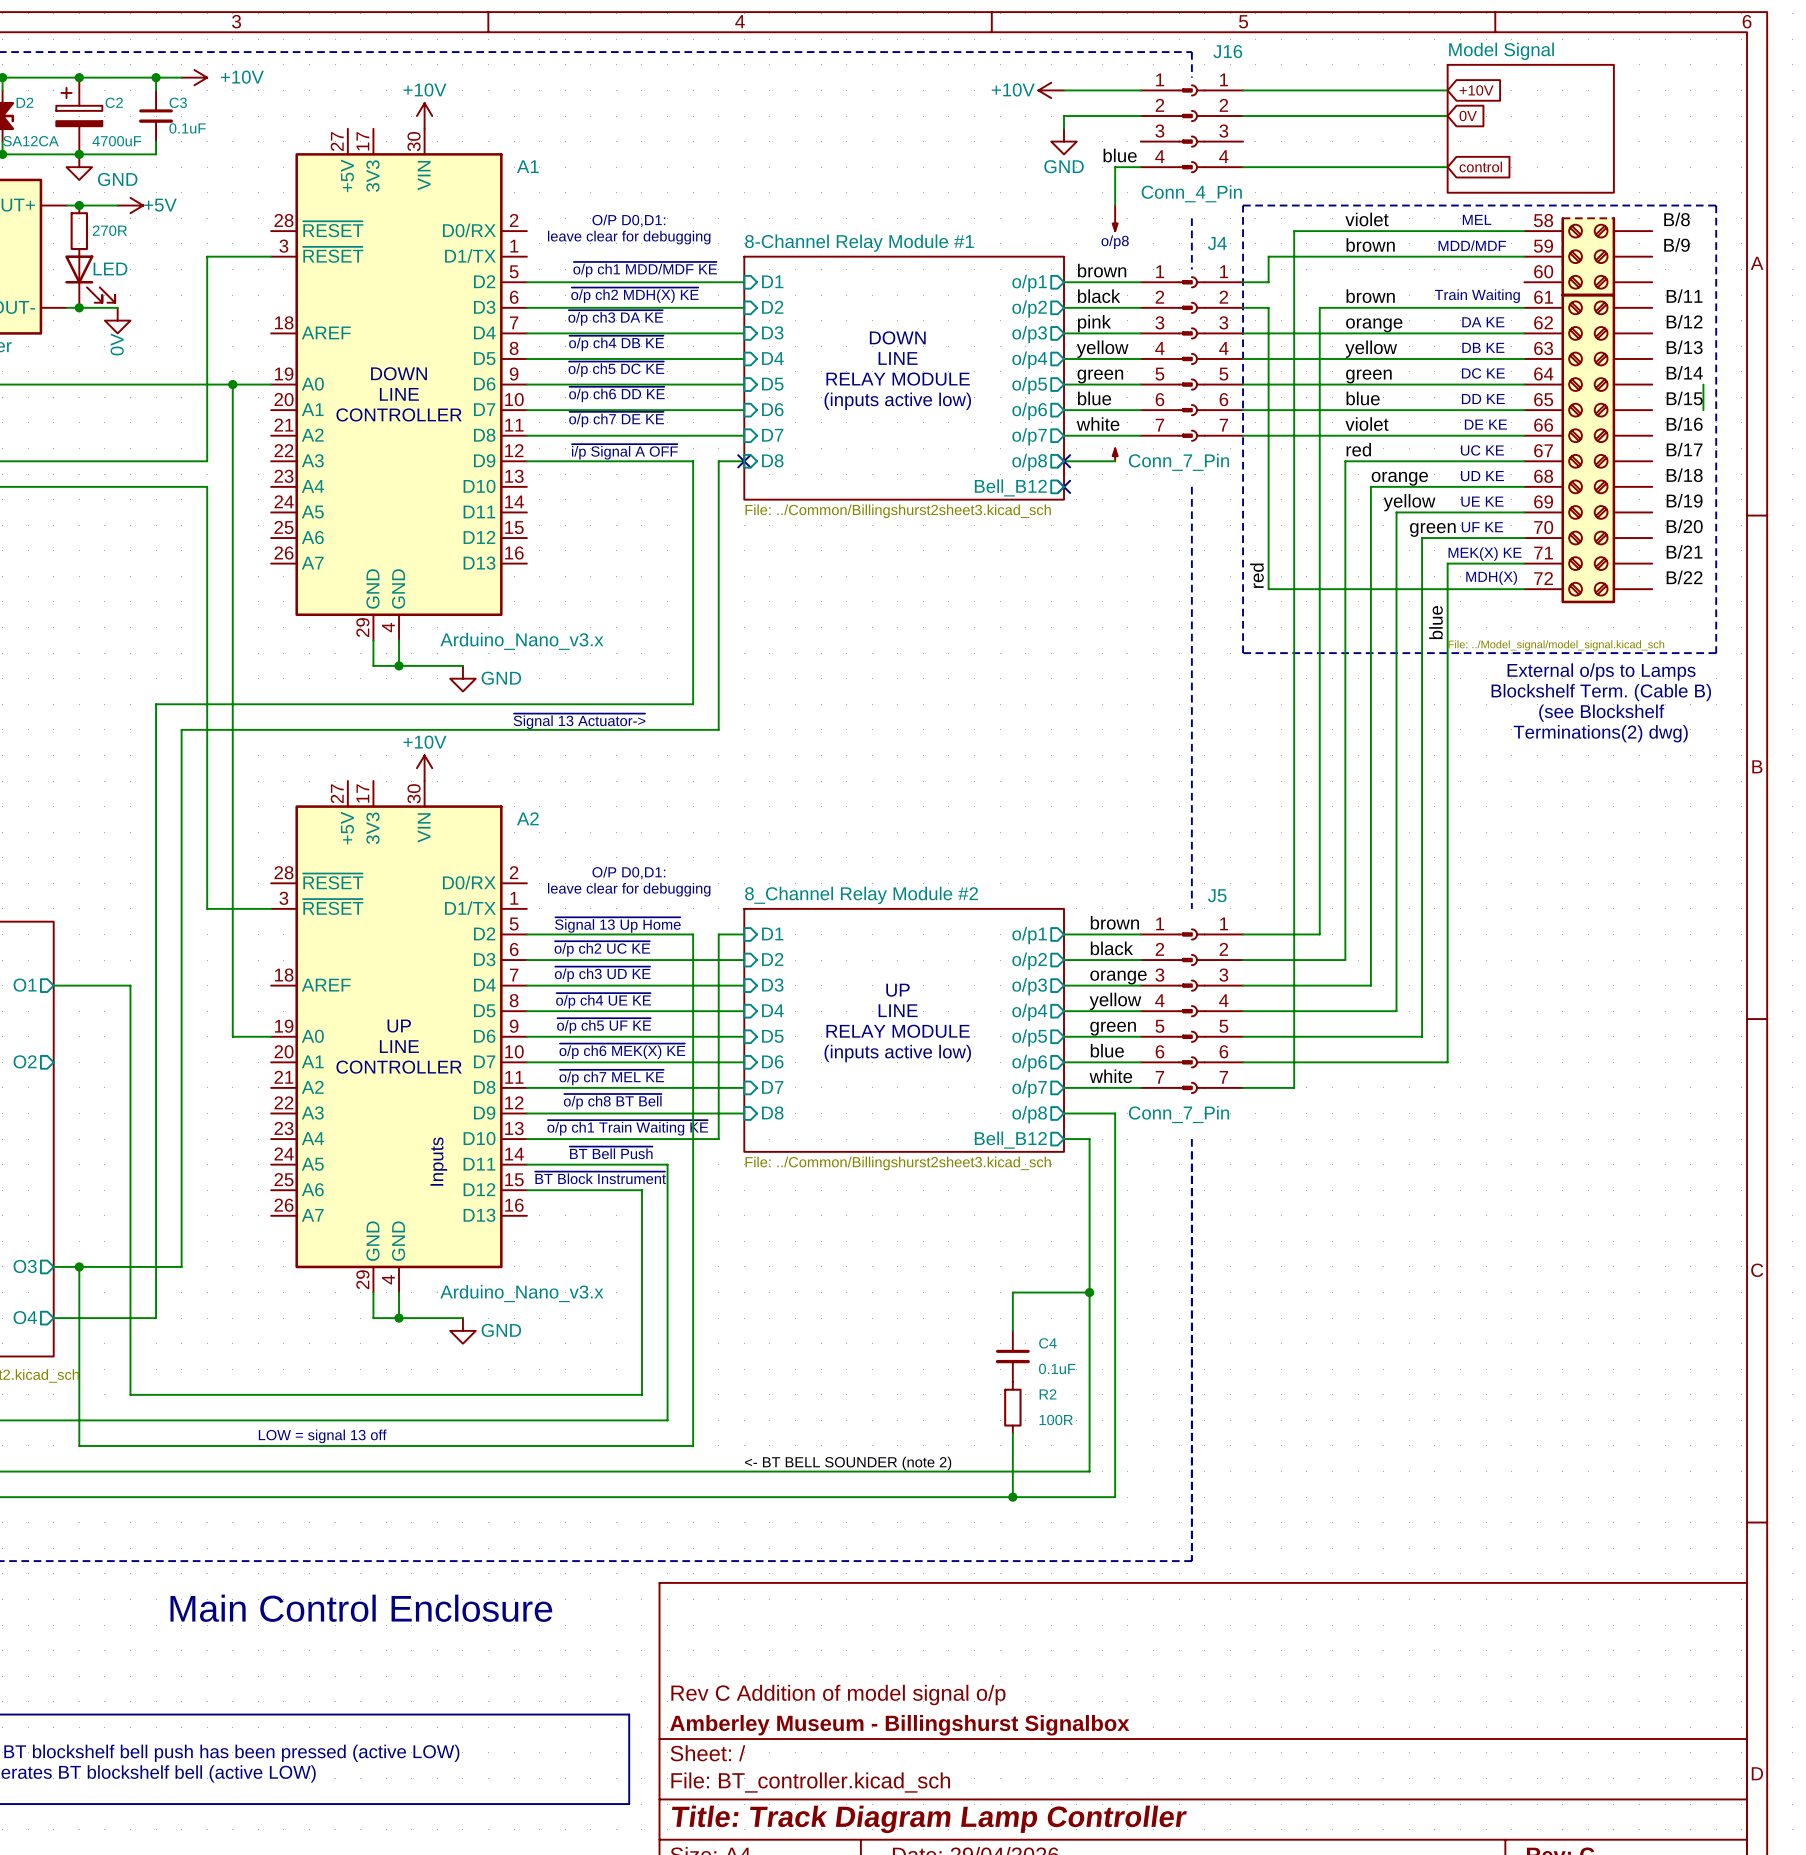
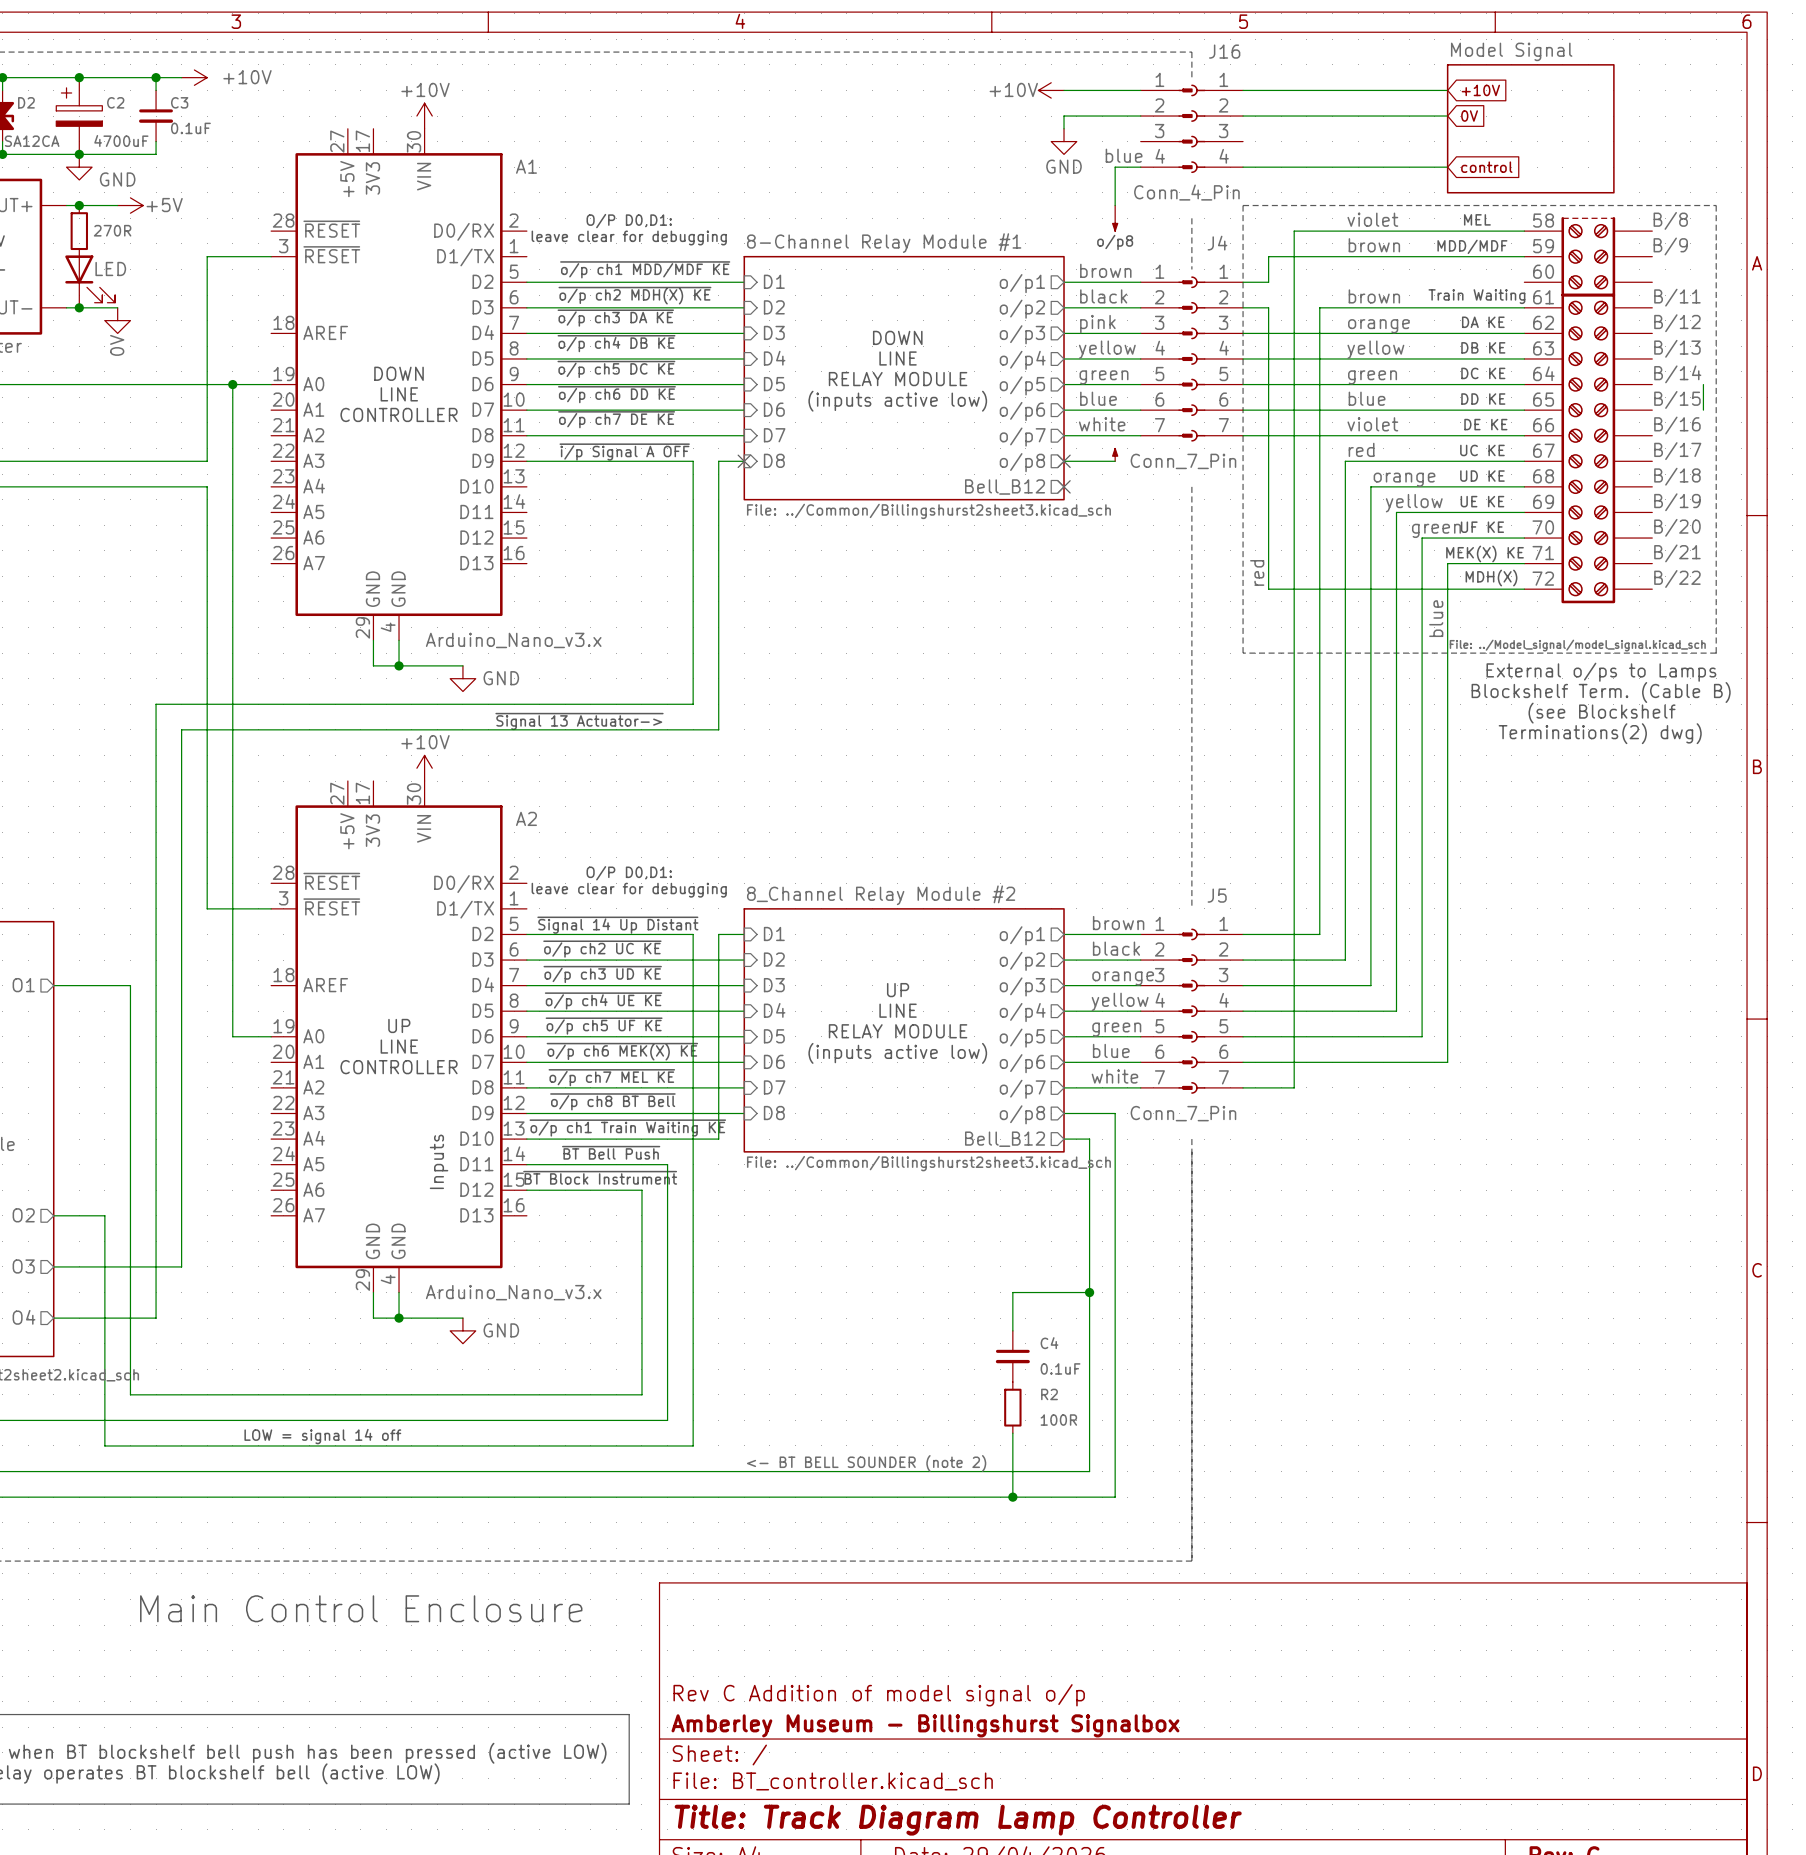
text: ~{Signal 13 Up Home} (617, 925) -> ~{Signal 14 Up Distant} (617, 925)
sheet pin position: O2 (25, 1061) -> O2 (23, 1215)
wire: (79, 1266) (79, 1445) (104, 1445) -> (53, 1215) (104, 1215) (104, 1445)
junction: (79, 1266) -> none
text: LOW = signal 13 off (322, 1436) -> LOW = signal 14 off (322, 1436)

